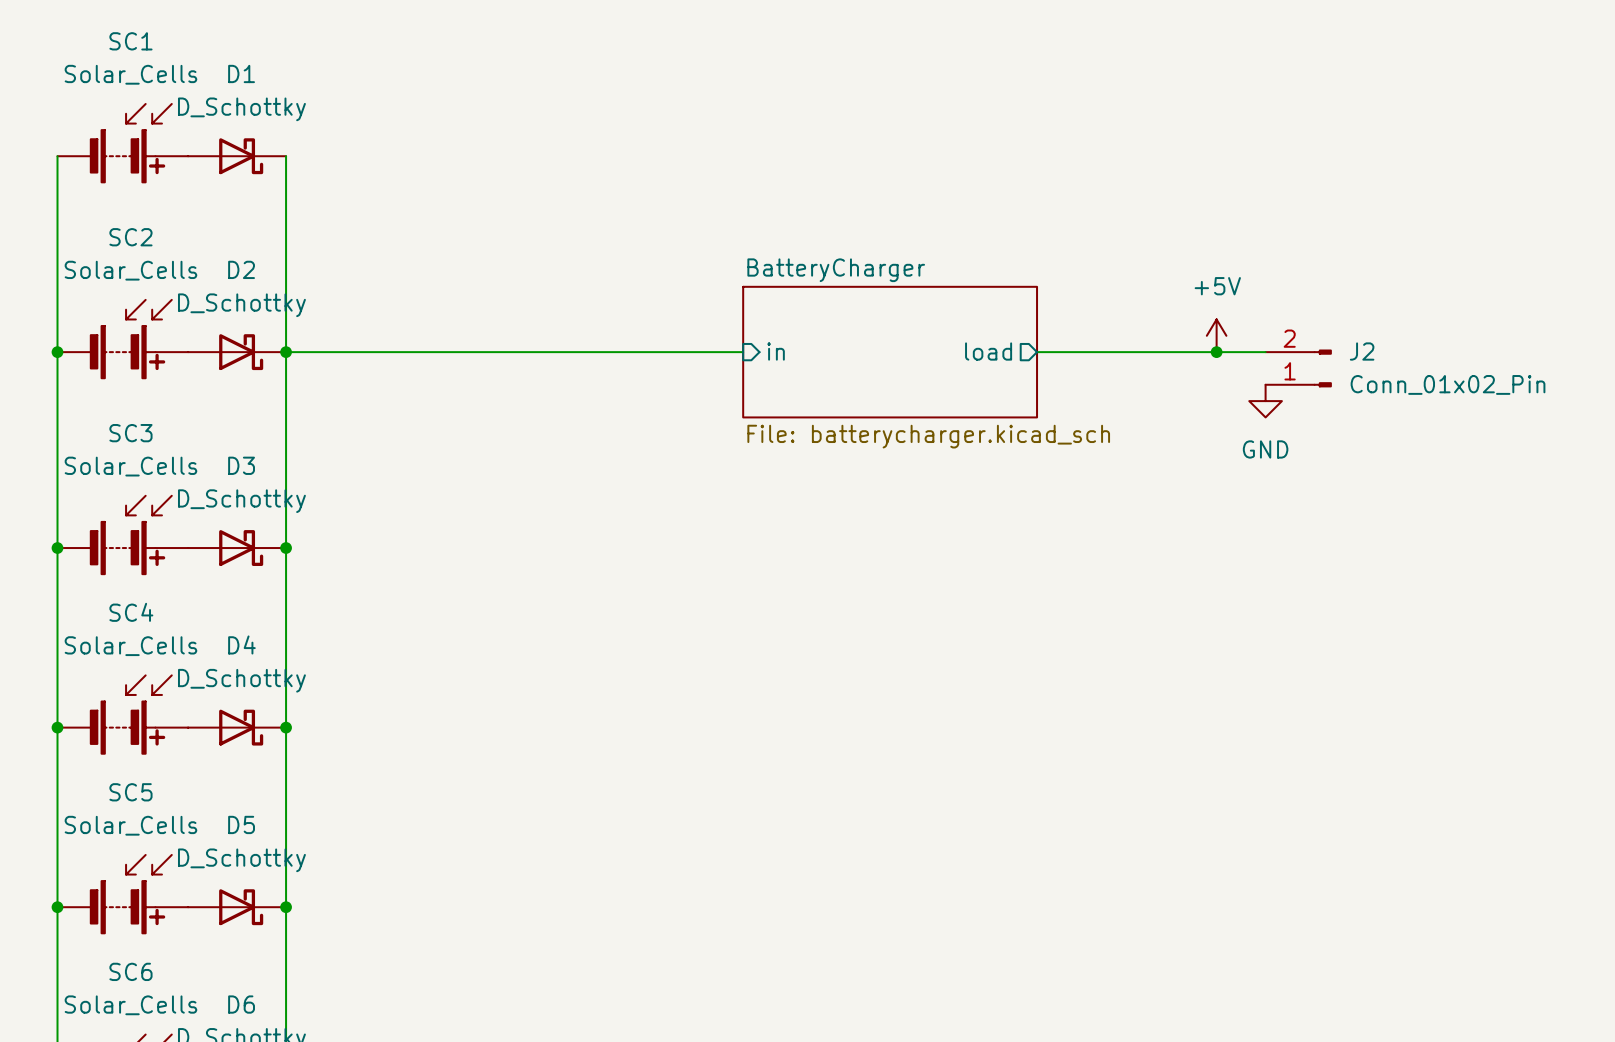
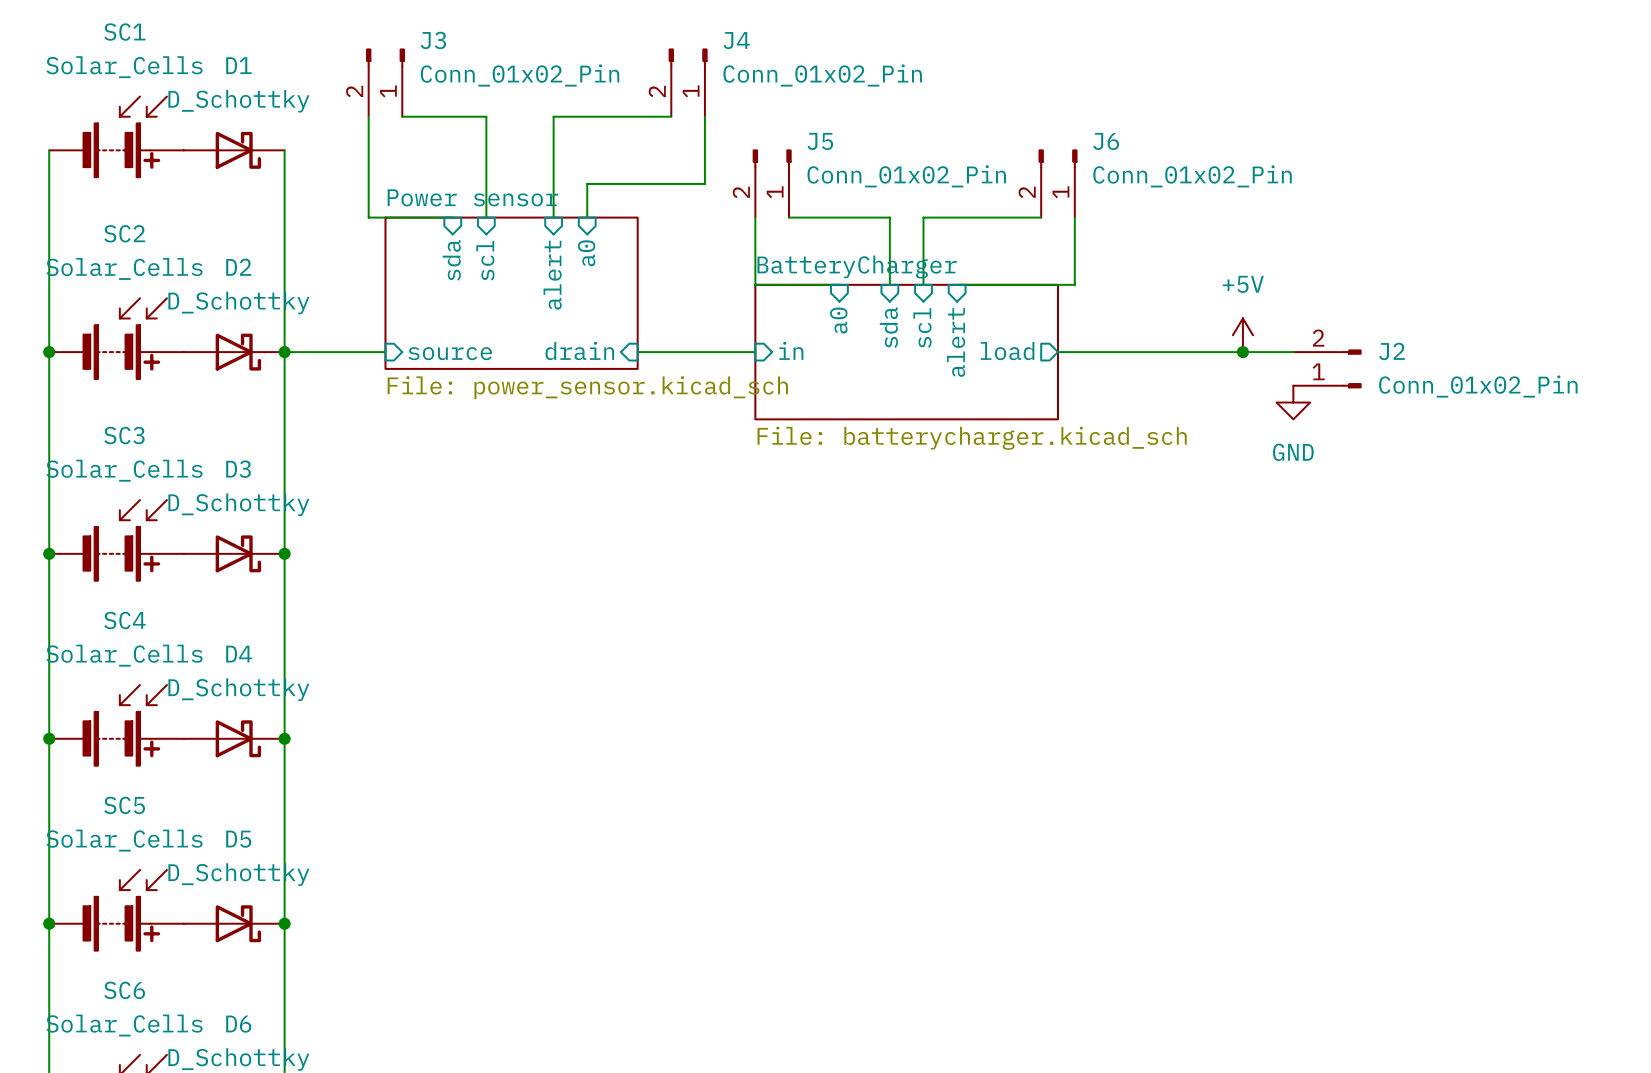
J3: none -> Conn_01x02_Pin (385, 82)
J4: none -> Conn_01x02_Pin (688, 82)
wire: none -> (368, 116) (368, 217) (452, 217)
wire: none -> (402, 116) (486, 116) (486, 217)
wire: none -> (671, 116) (553, 116) (553, 217)
wire: none -> (704, 116) (704, 183) (587, 183) (587, 217)
J5: none -> Conn_01x02_Pin (772, 183)
J6: none -> Conn_01x02_Pin (1057, 183)
wire: none -> (755, 217) (755, 284) (839, 284)
wire: none -> (788, 217) (889, 217) (889, 284)
wire: none -> (1041, 217) (923, 217) (923, 284)
wire: none -> (1074, 217) (1074, 284) (957, 284)
sheet pin: none -> a0 (586, 253)
sheet pin: none -> scl (485, 260)
sheet pin: none -> sda (451, 260)
sheet pin: none -> alert (552, 275)
sheet Power sensor: none -> File: power_sensor.kicad_sch (511, 293)
sheet pin: none -> a0 (838, 320)
sheet pin: none -> scl (922, 328)
sheet pin: none -> sda (888, 327)
sheet pin: none -> alert (956, 342)
sheet pin: none -> drain (579, 351)
wire: (384, 352) (628, 352) -> none
sheet pin: none -> source (450, 353)

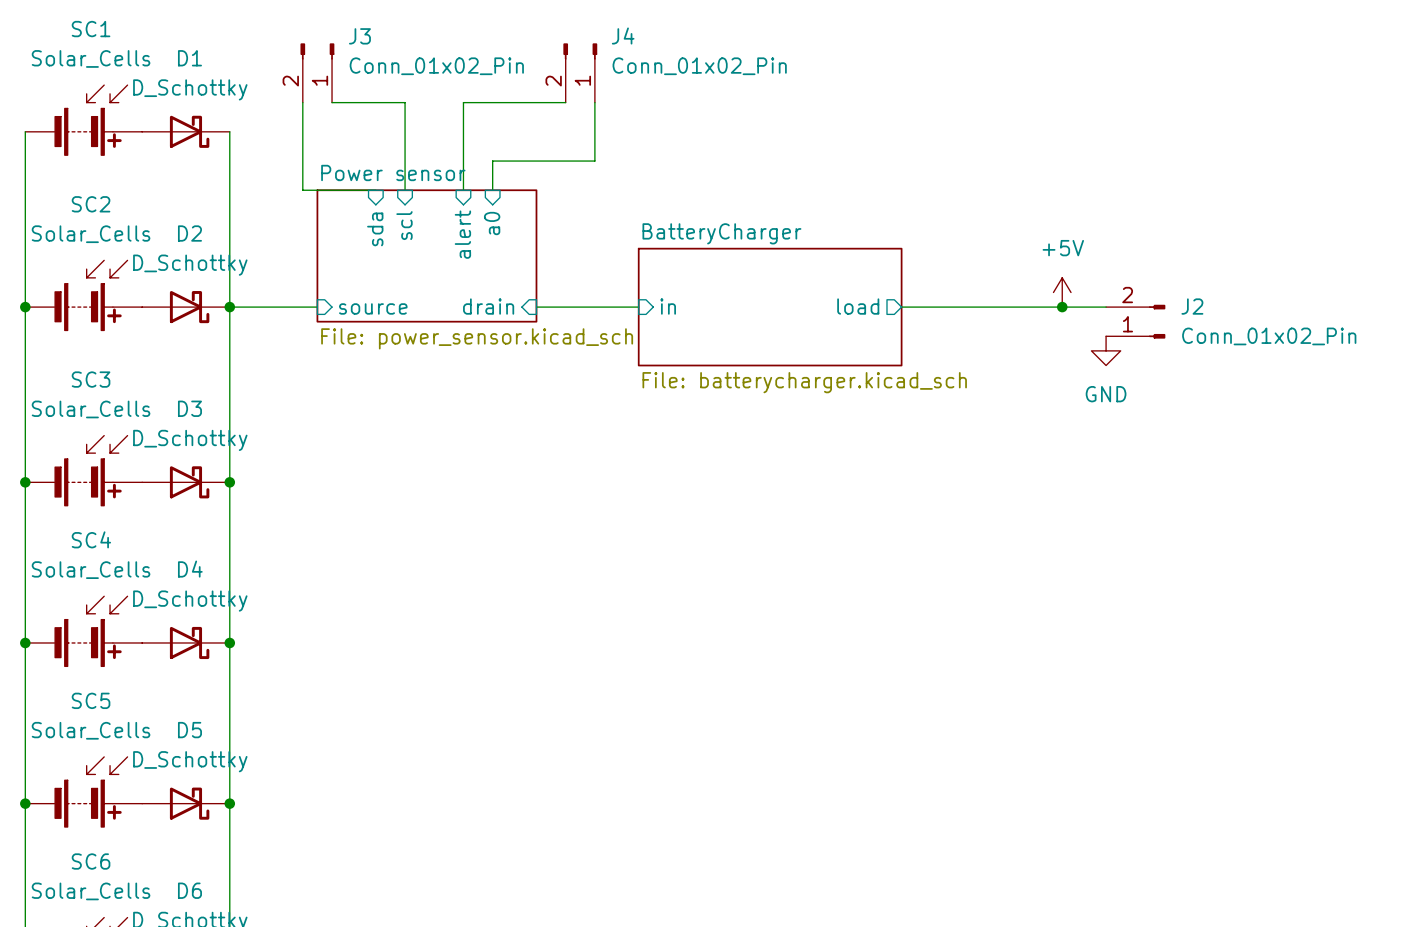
J5: Conn_01x02_Pin (772, 183) -> none
J6: Conn_01x02_Pin (1057, 183) -> none
wire: (755, 217) (755, 284) (839, 284) -> none
wire: (788, 217) (889, 217) (889, 284) -> none
wire: (1041, 217) (923, 217) (923, 284) -> none
wire: (1074, 217) (1074, 284) (957, 284) -> none
sheet pin: a0 (838, 320) -> none
sheet pin: sda (888, 327) -> none
sheet pin: scl (922, 328) -> none
sheet pin: alert (956, 342) -> none

